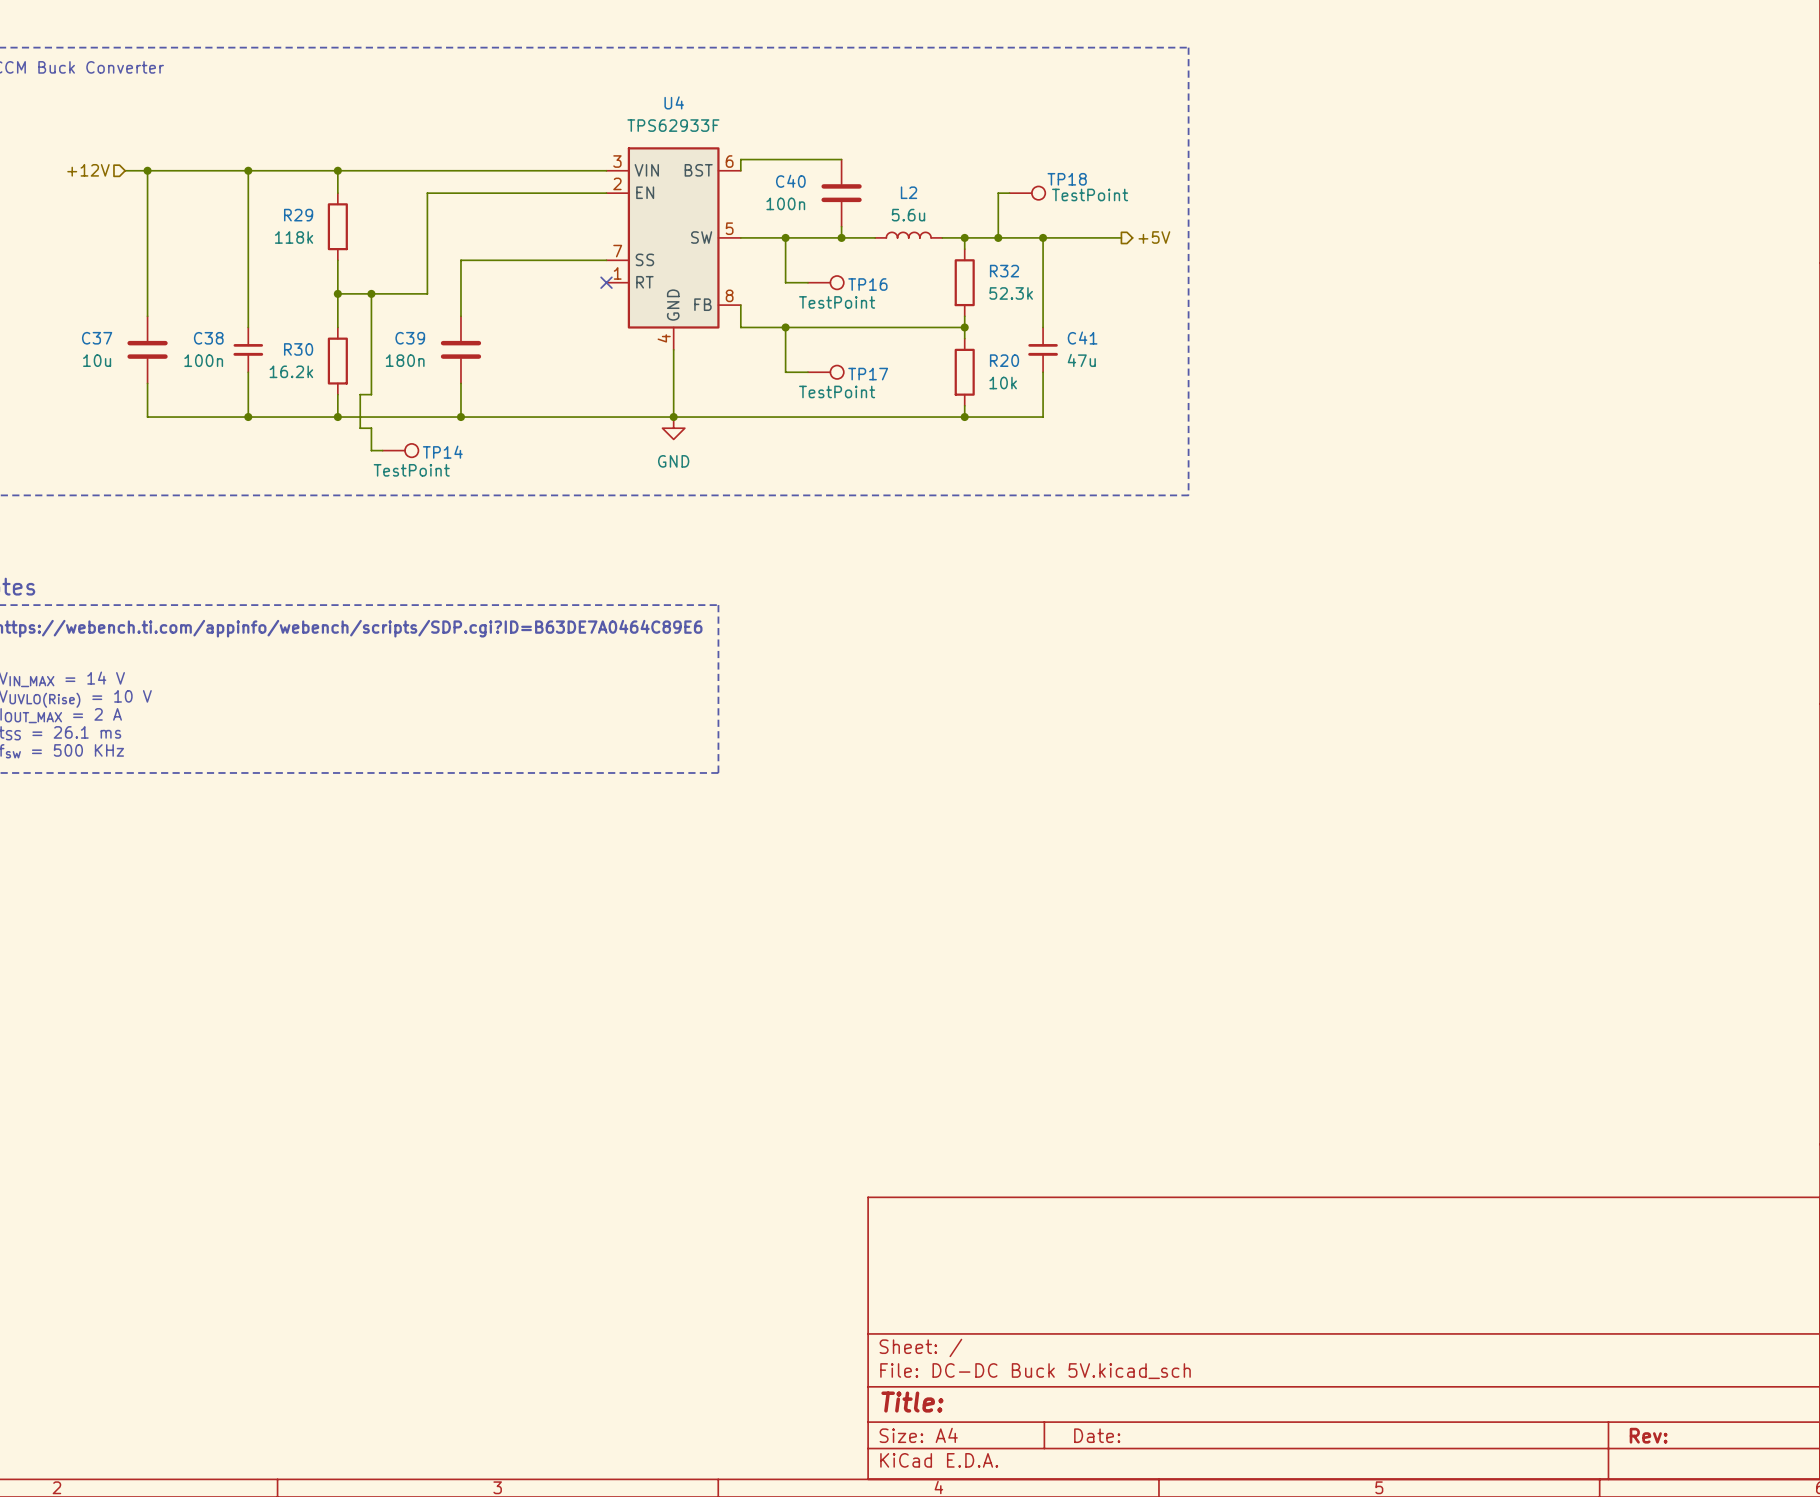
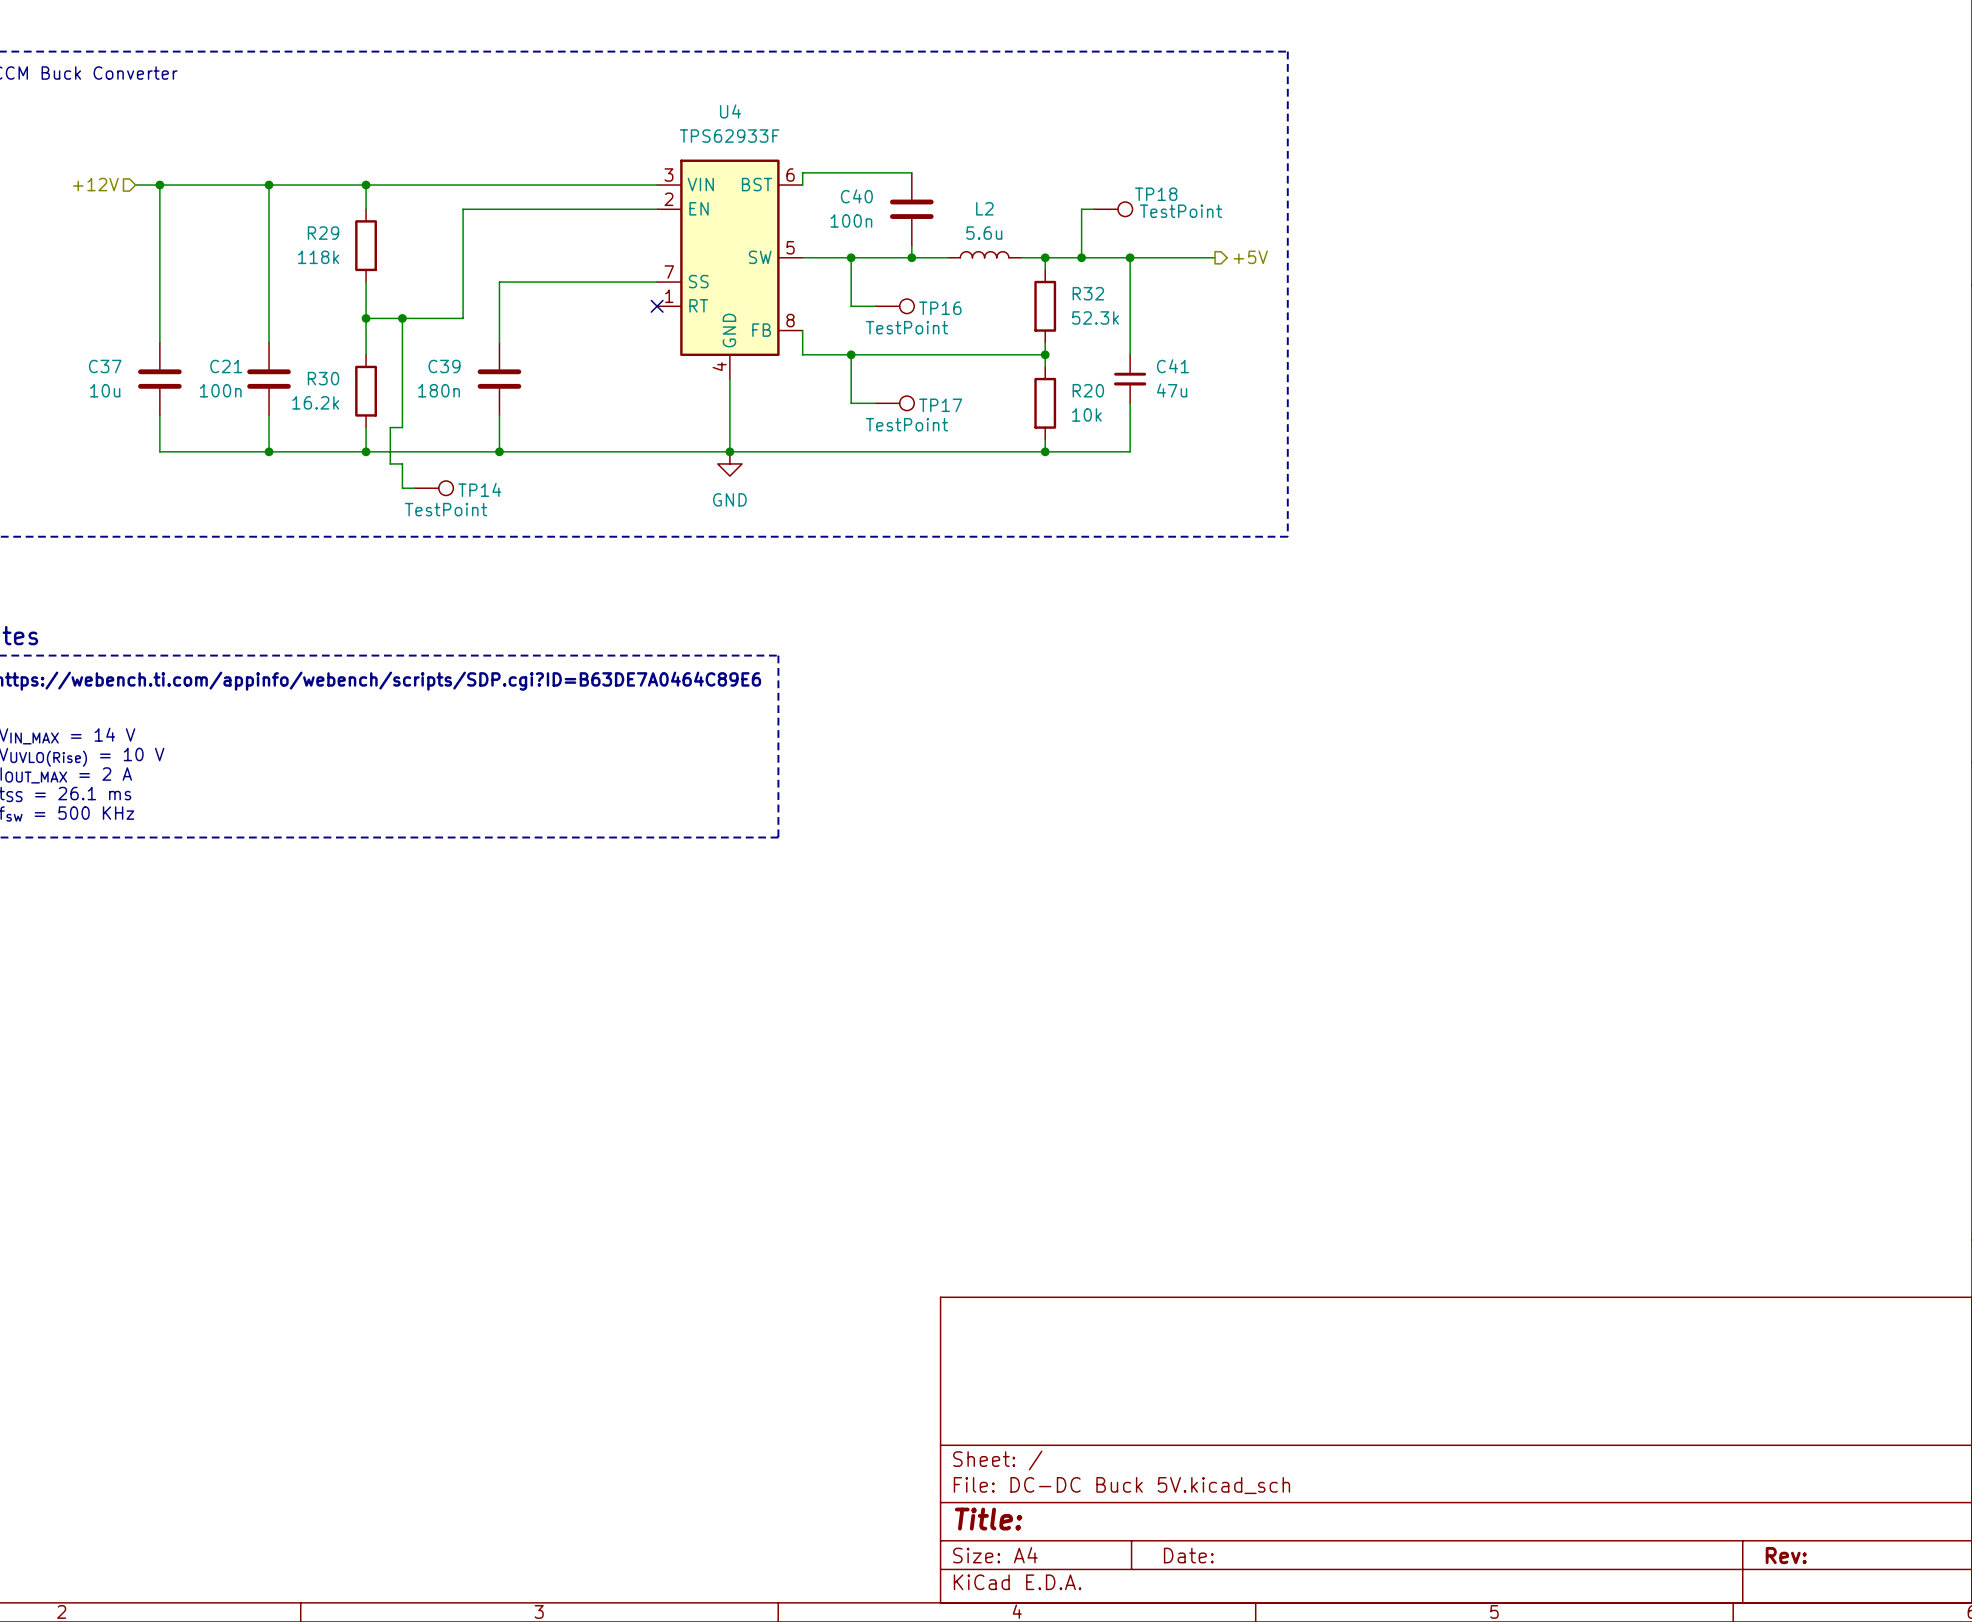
C38: 100n (248, 349) -> none
C21: none -> 100n (269, 379)

